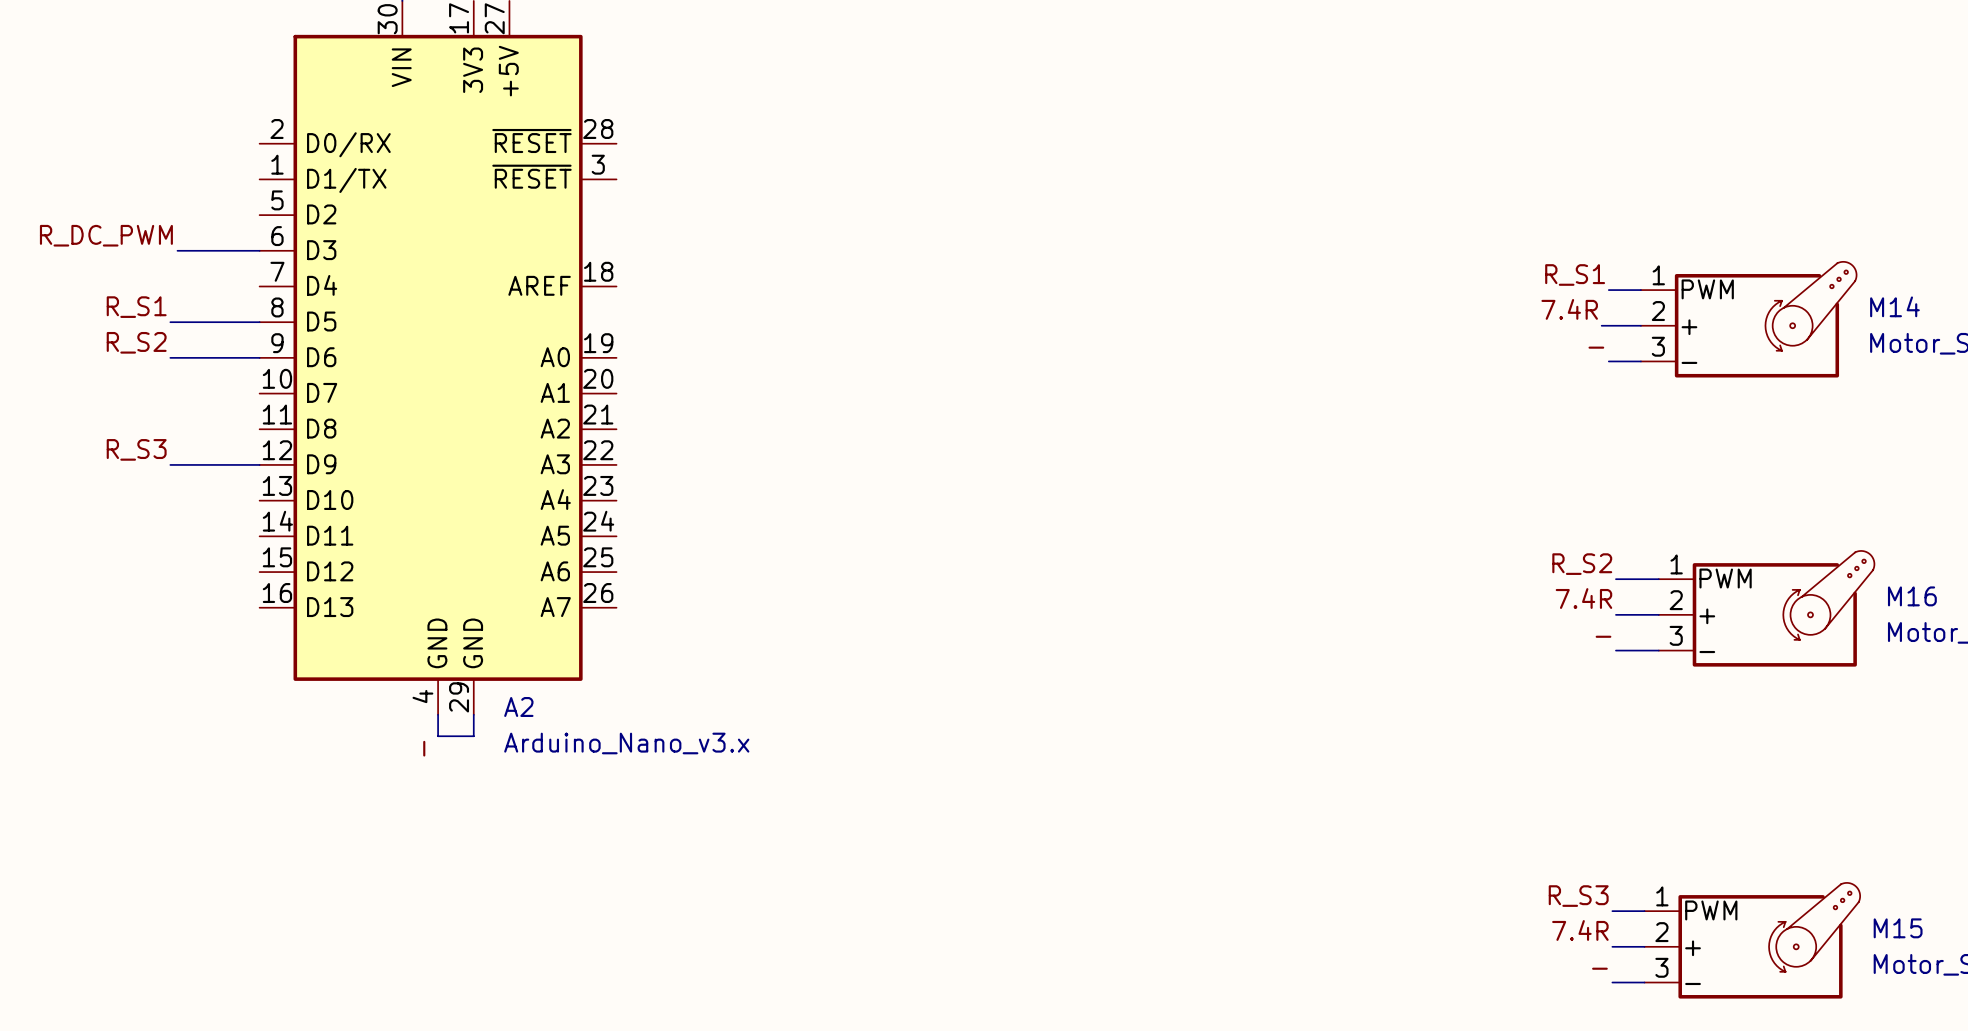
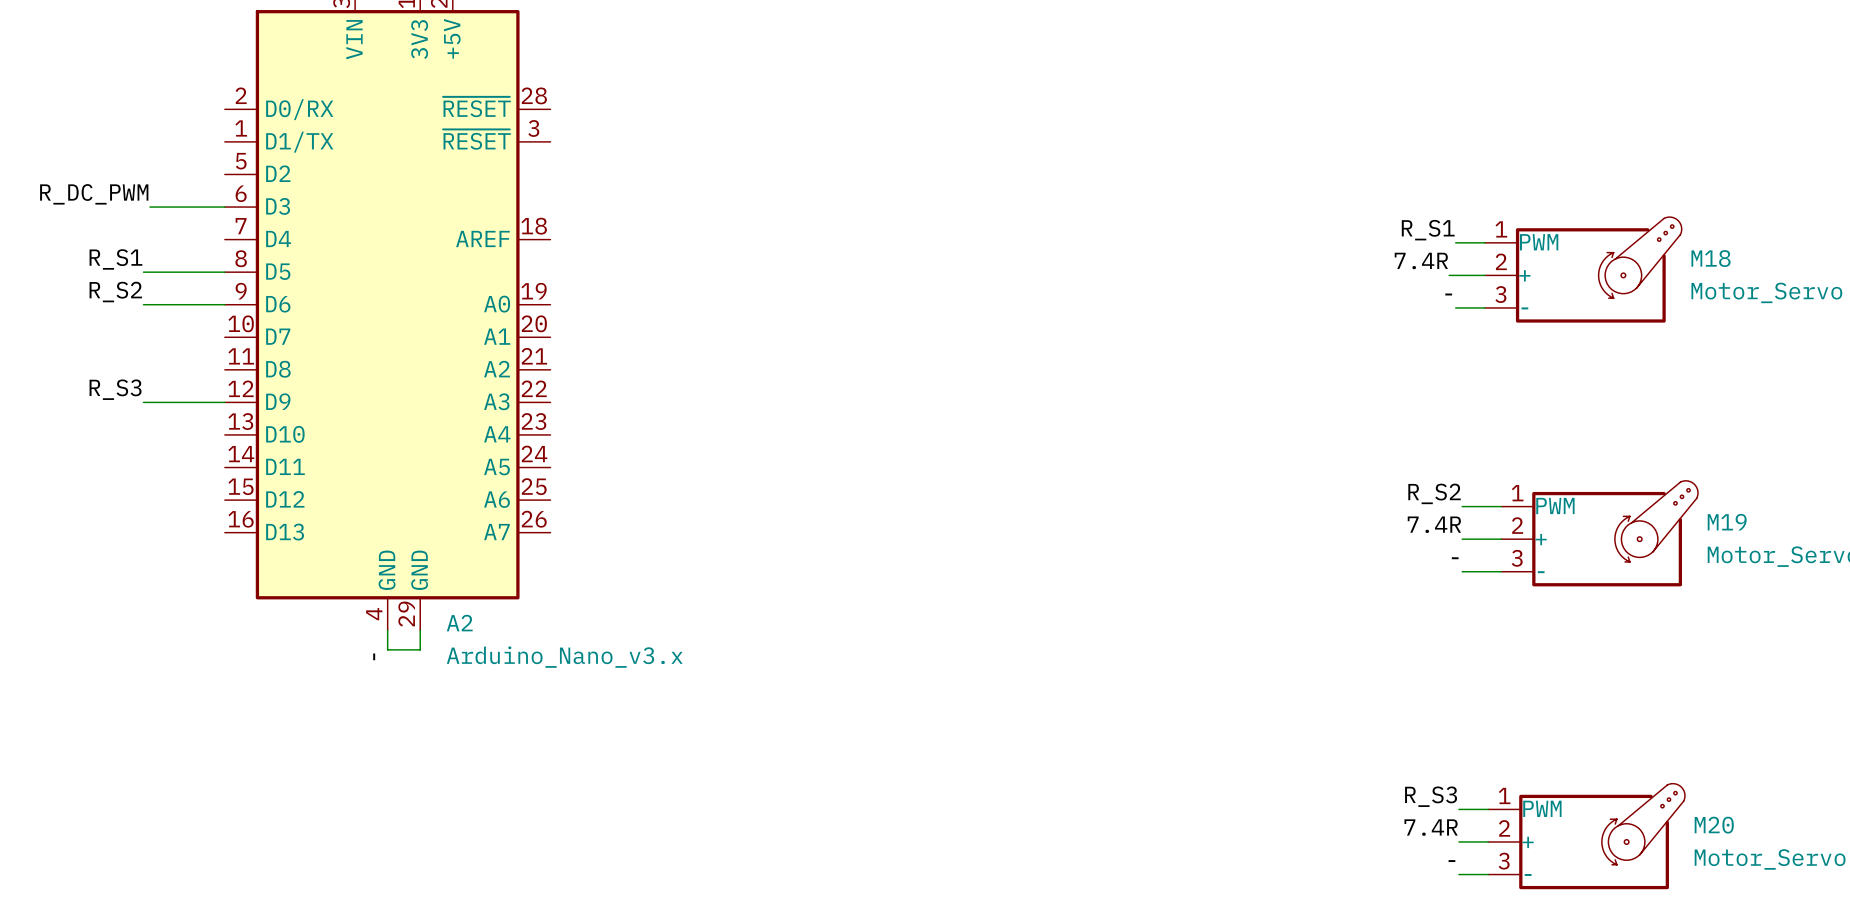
M14 name: M14 (1894, 306) -> M18 (1711, 258)
M16 name: M16 (1912, 596) -> M19 (1727, 522)
M15 name: M15 (1898, 928) -> M20 (1714, 825)

